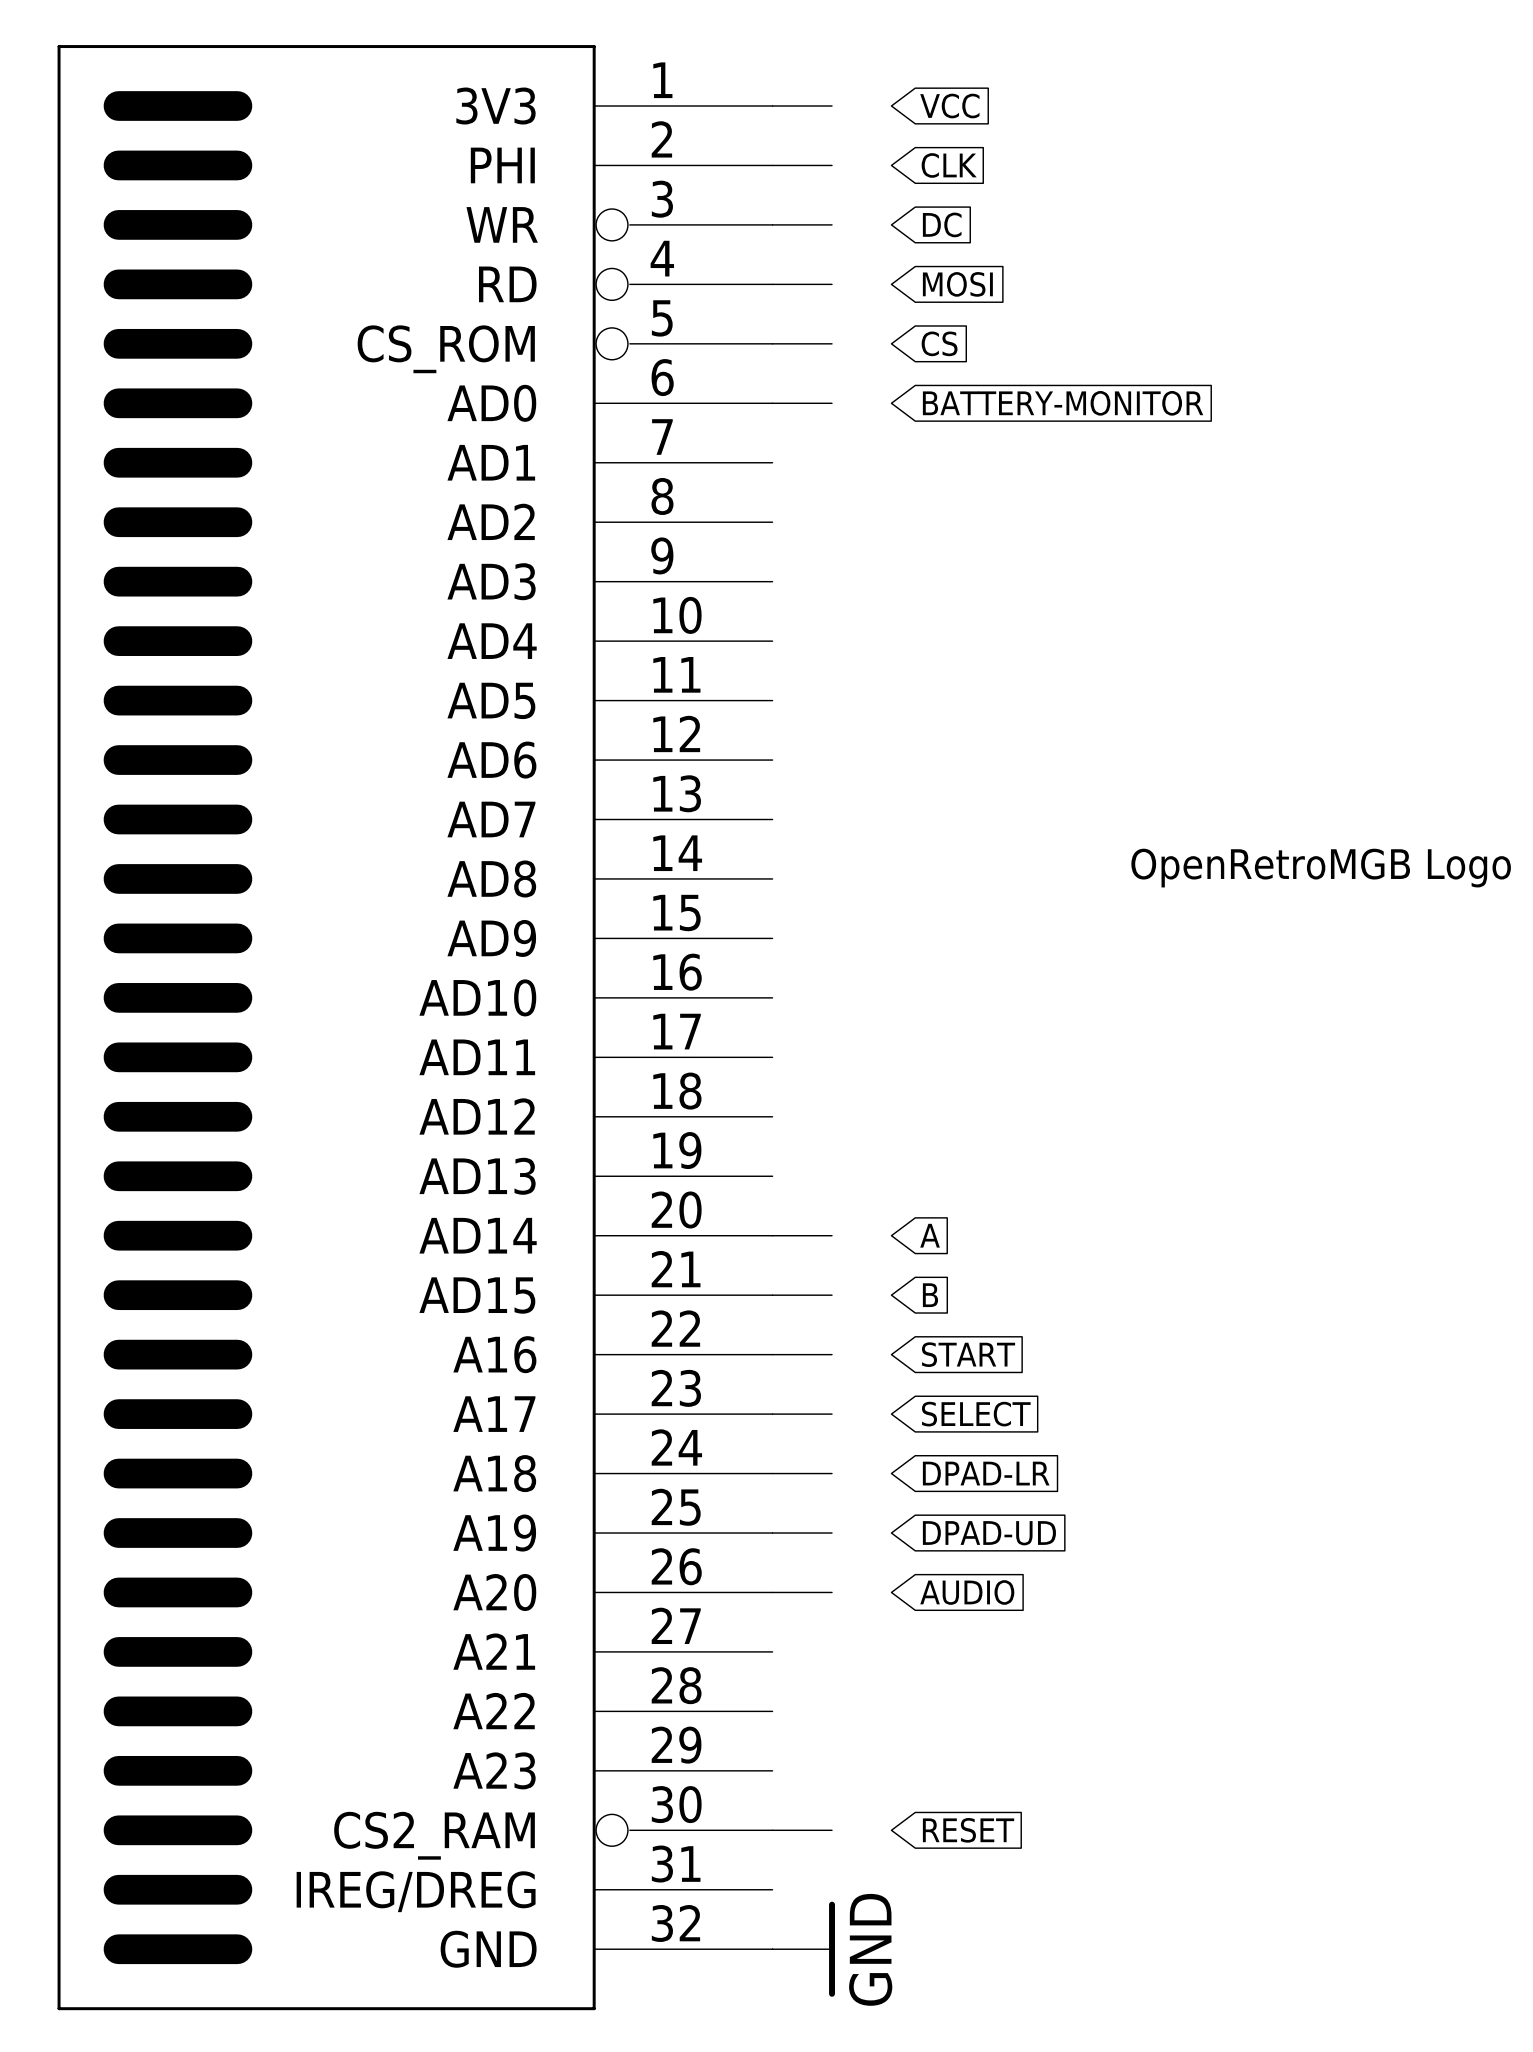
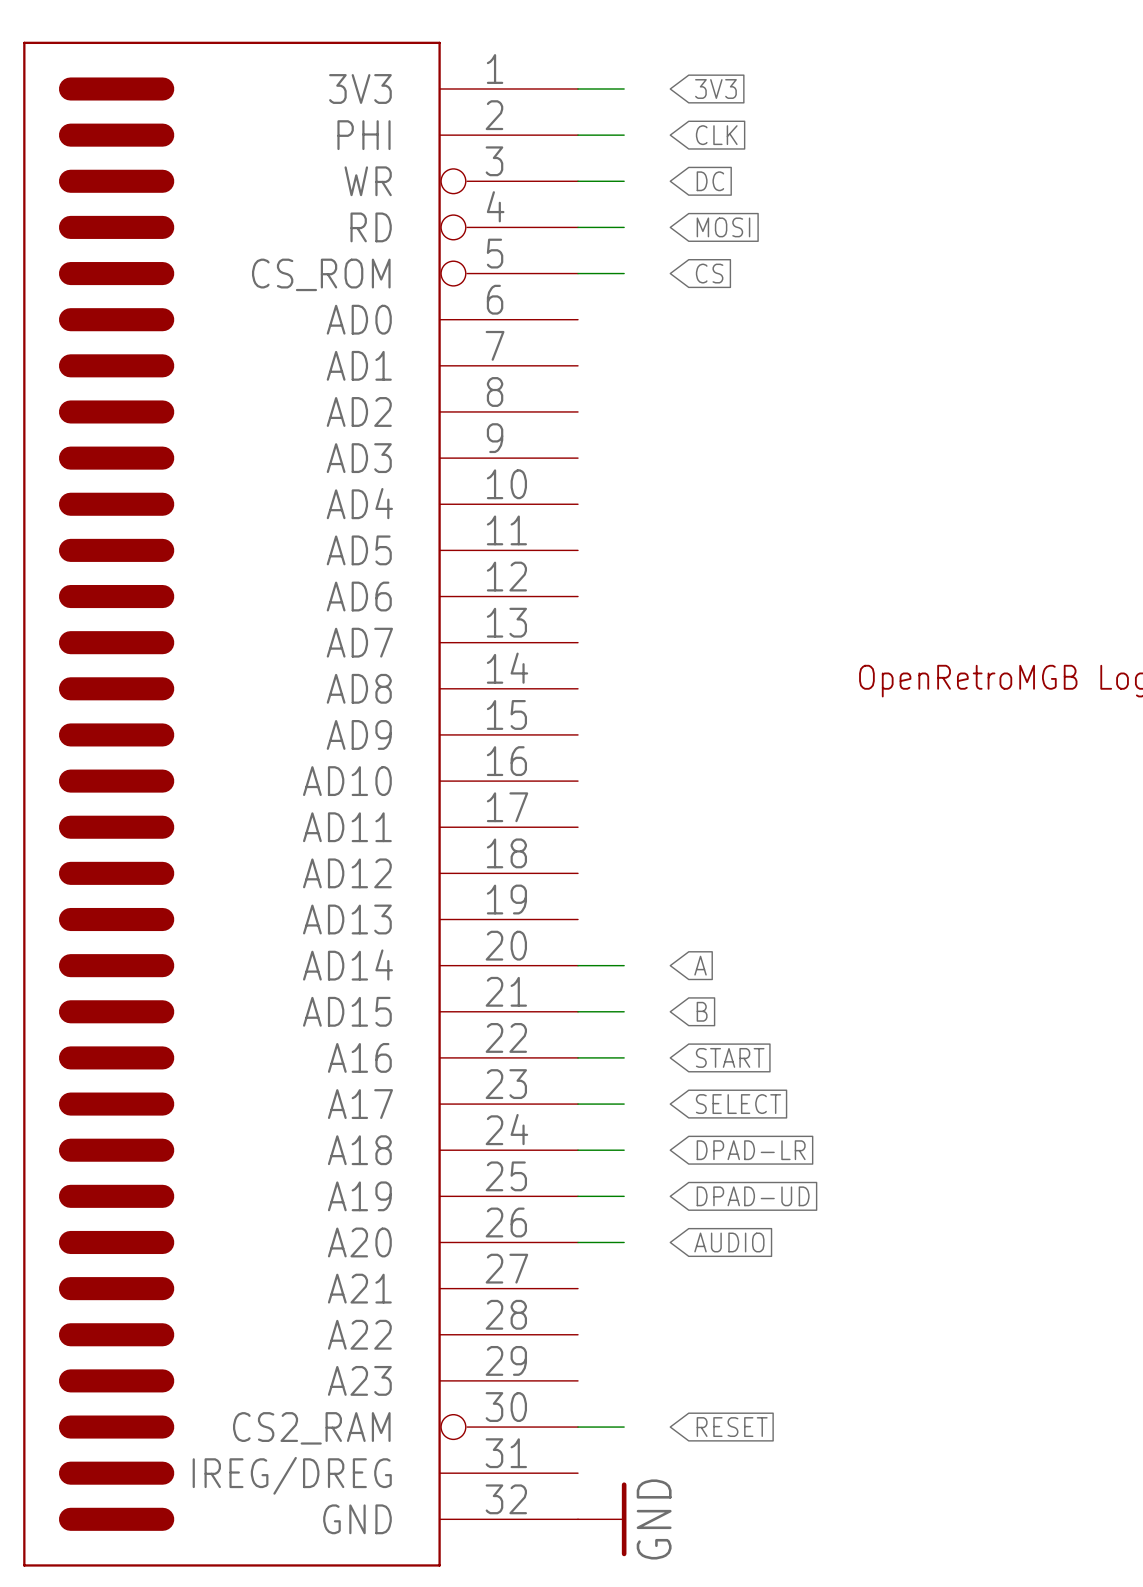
global label: VCC (949, 106) -> 3V3 (715, 88)
wire: (772, 403) (832, 403) -> none
global label: BATTERY-MONITOR (1063, 403) -> none

